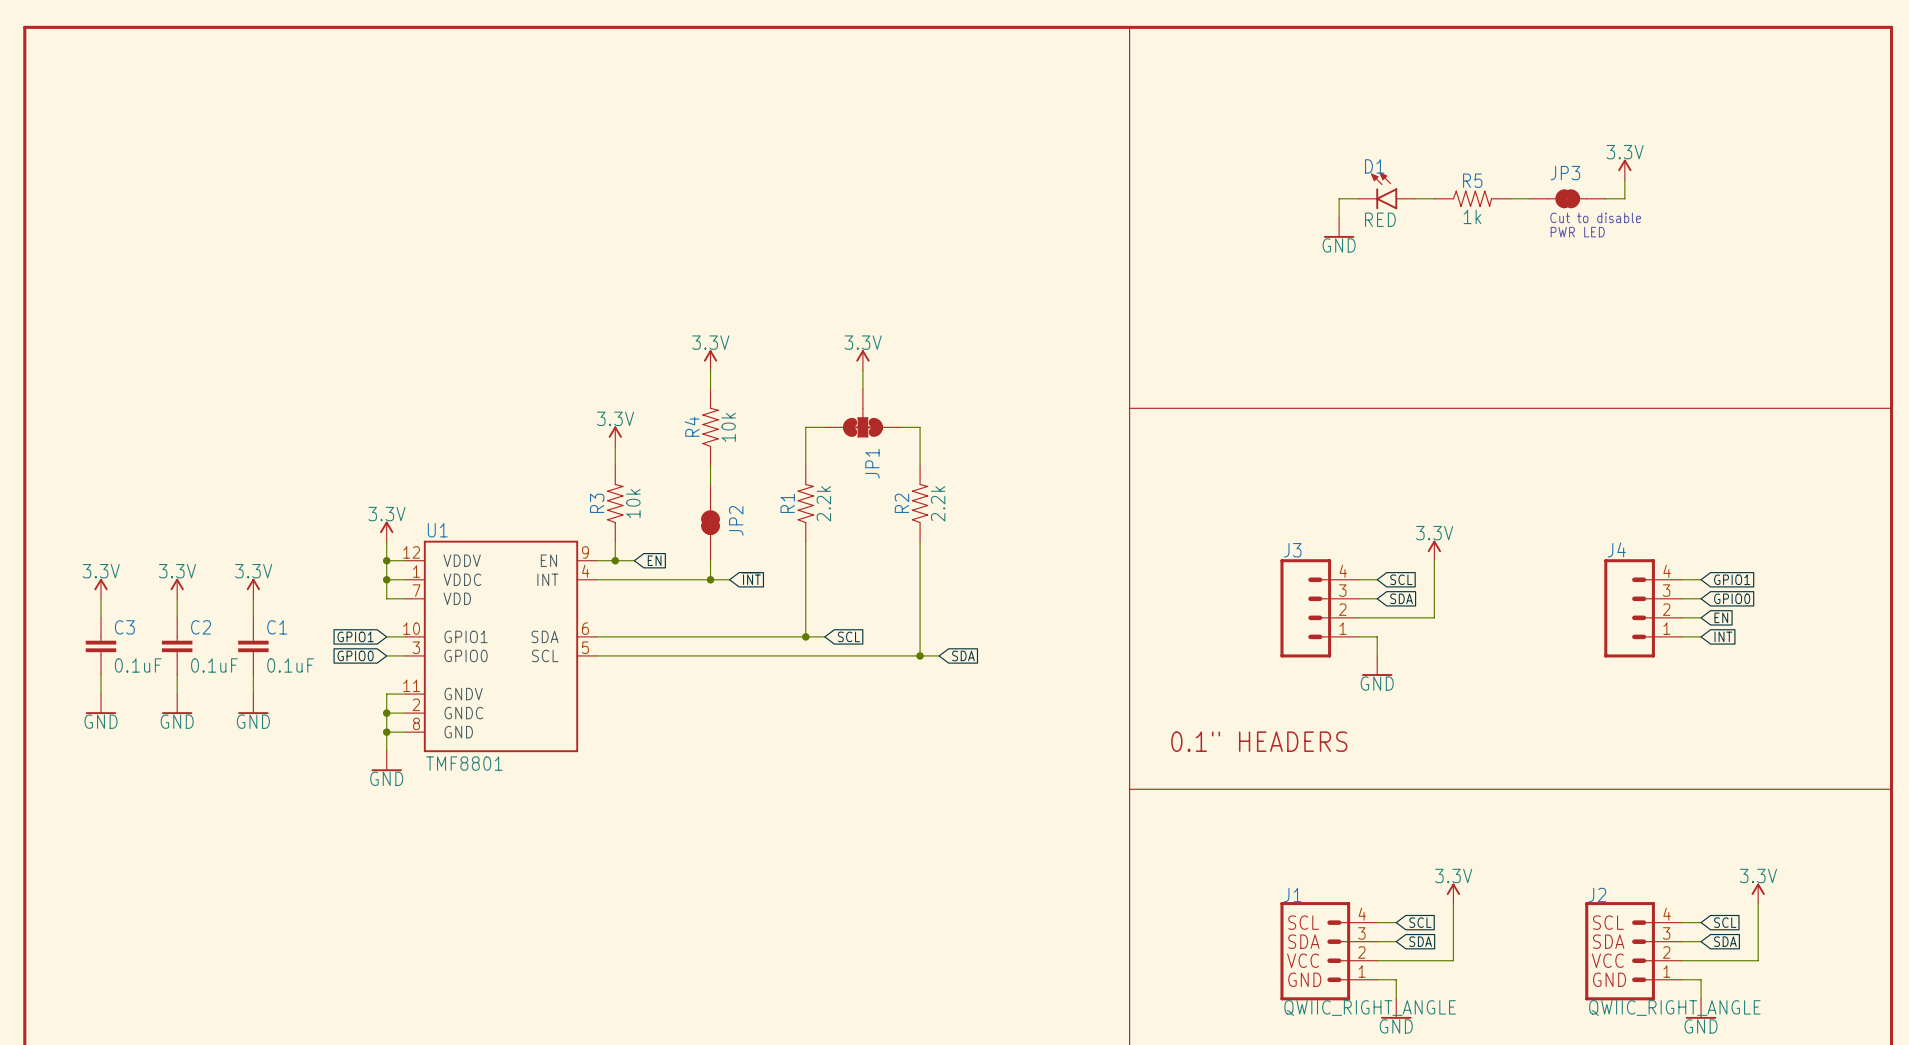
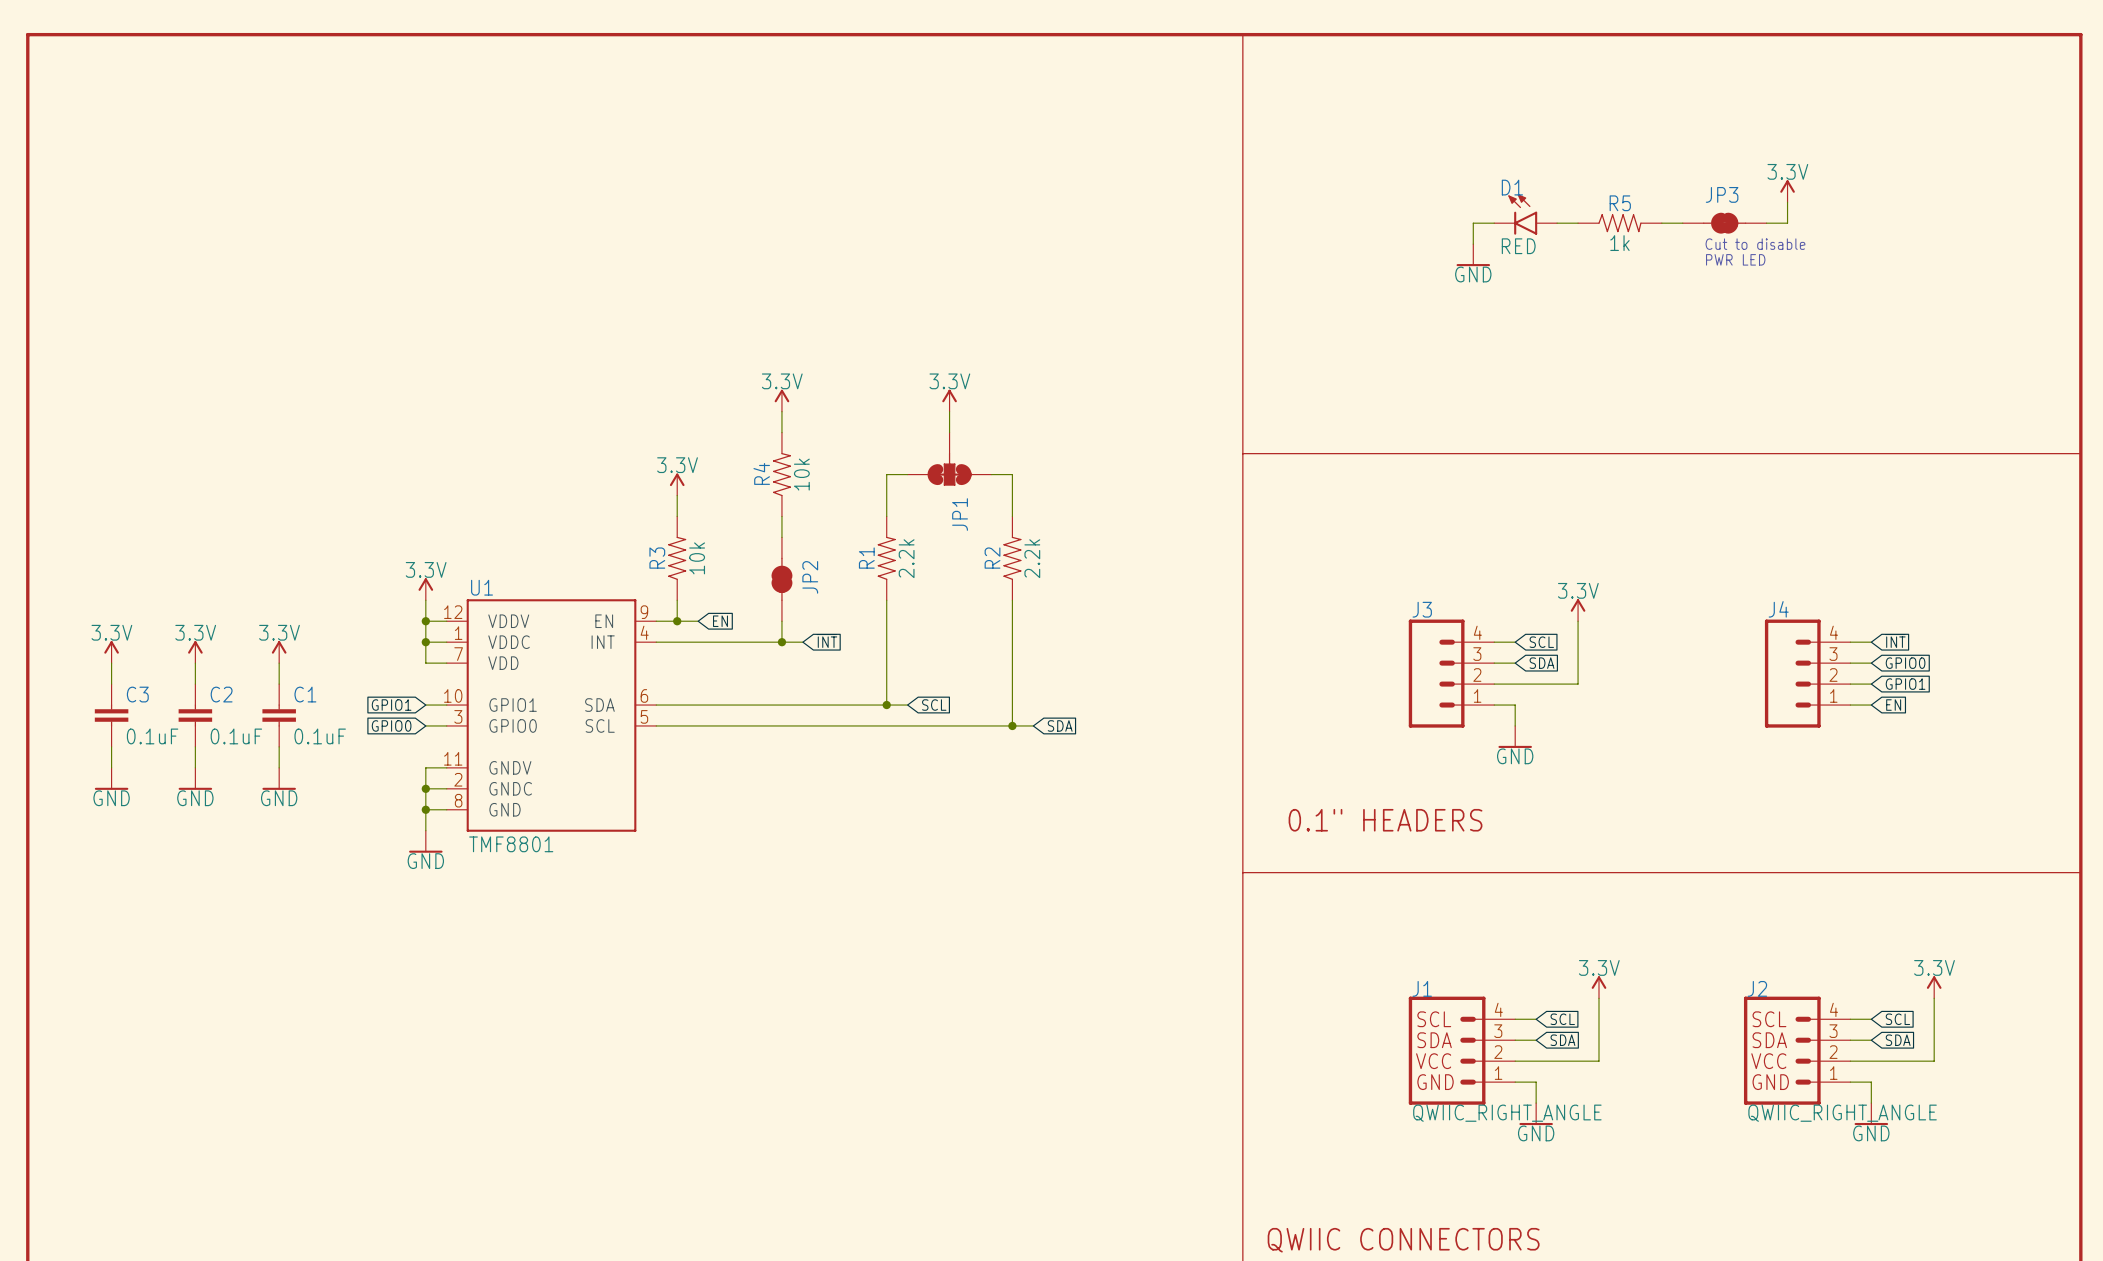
global label: GPIO1 (1732, 579) -> ~{INT} (1895, 640)
global label: EN (1721, 617) -> GPIO1 (1905, 684)
global label: INT (1723, 636) -> EN (1893, 705)

